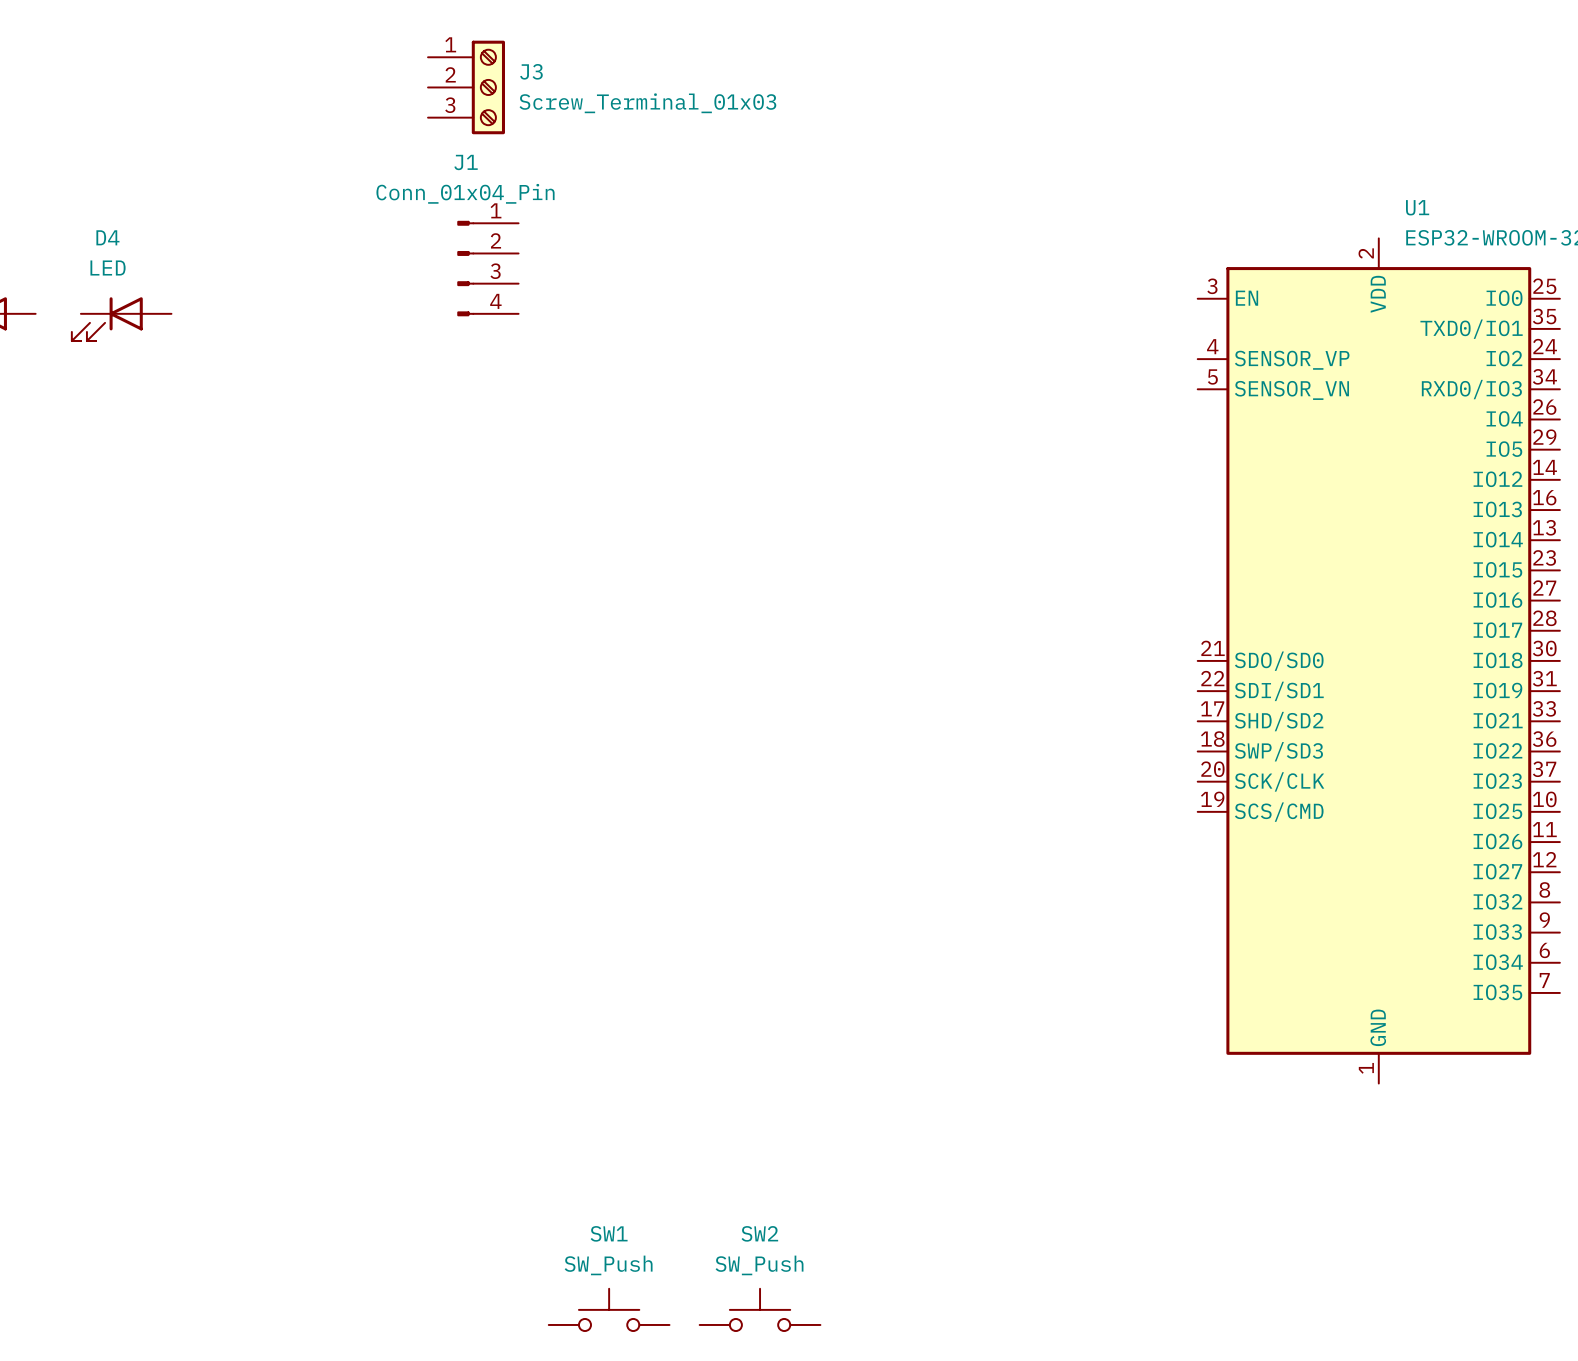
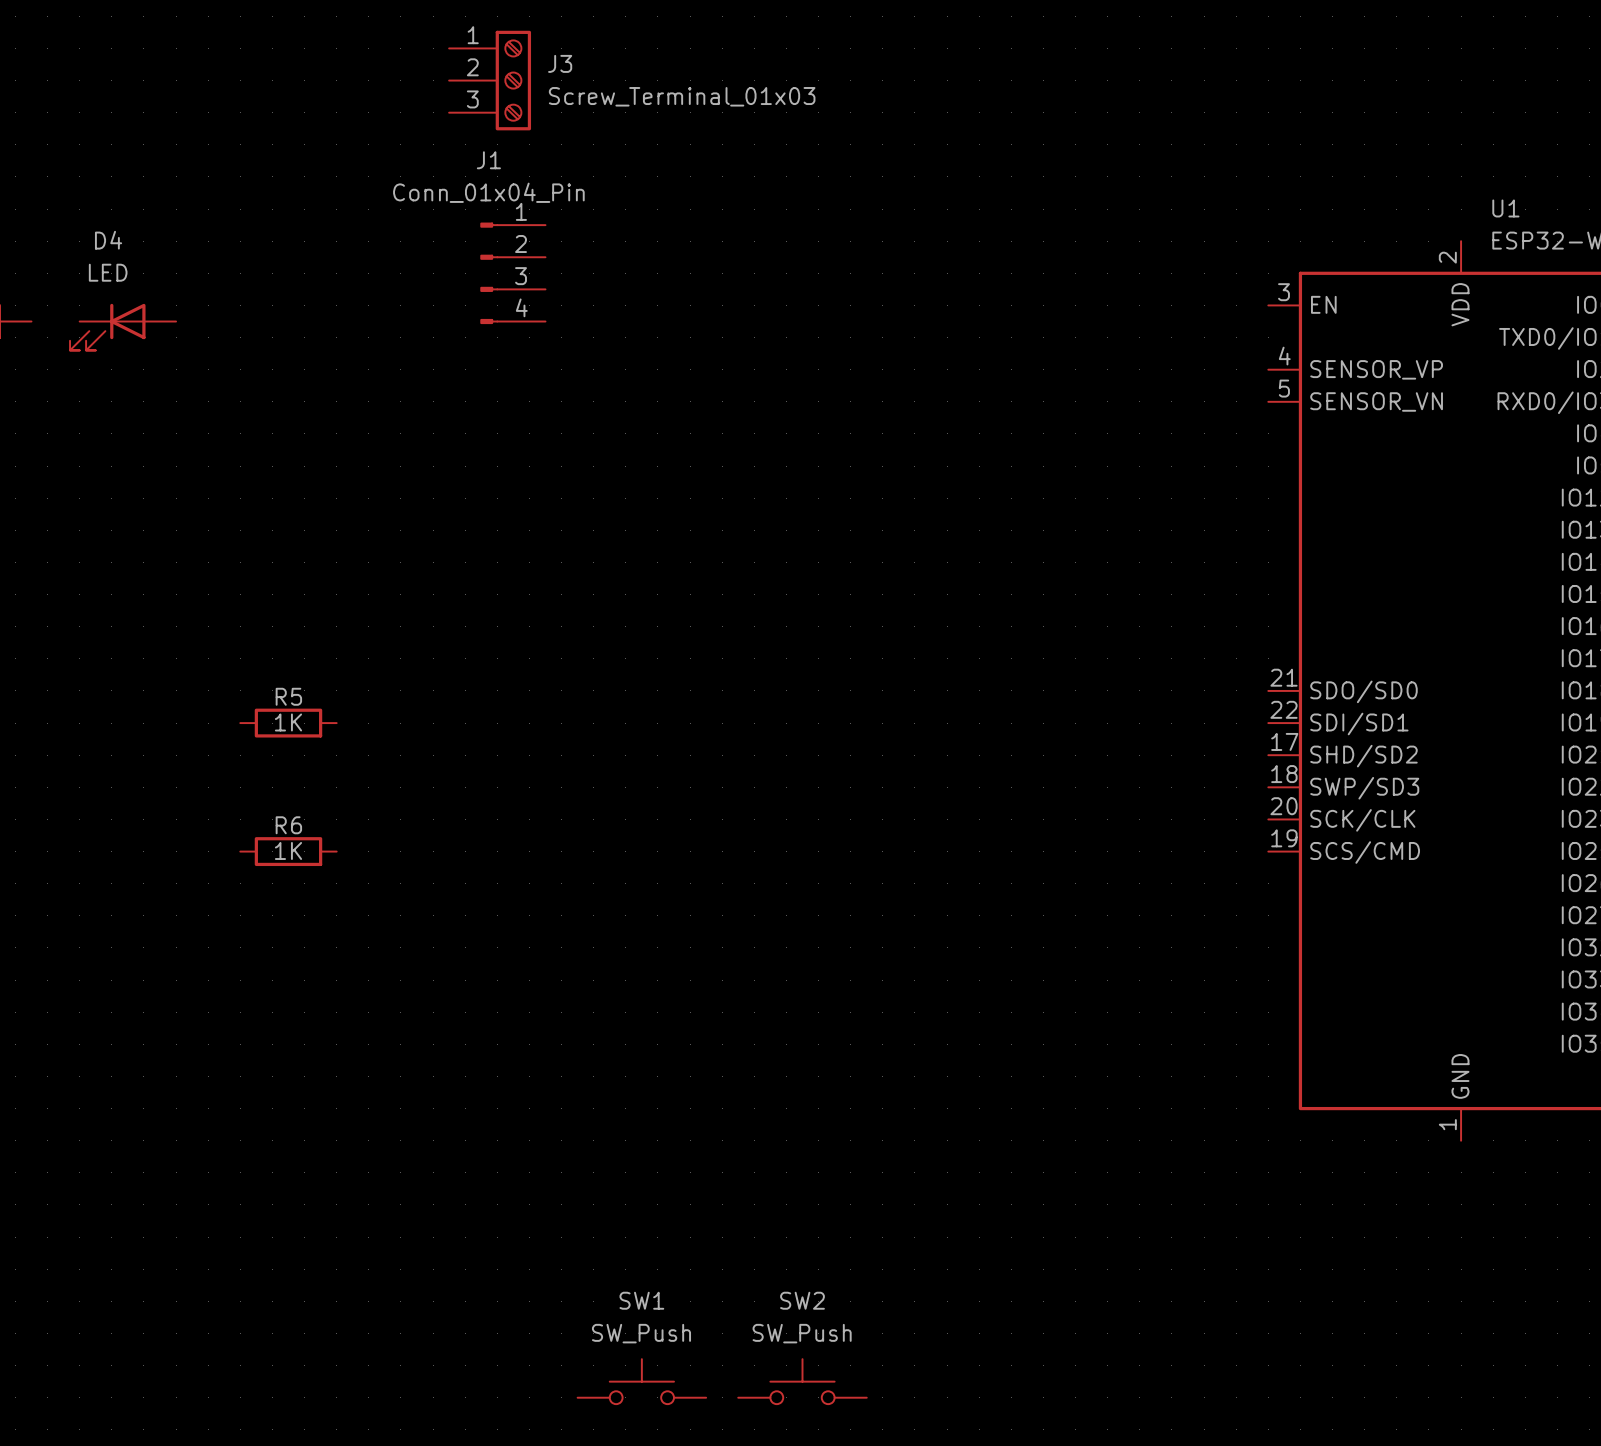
R5: none -> 1K (288, 723)
R6: none -> 1K (288, 851)

